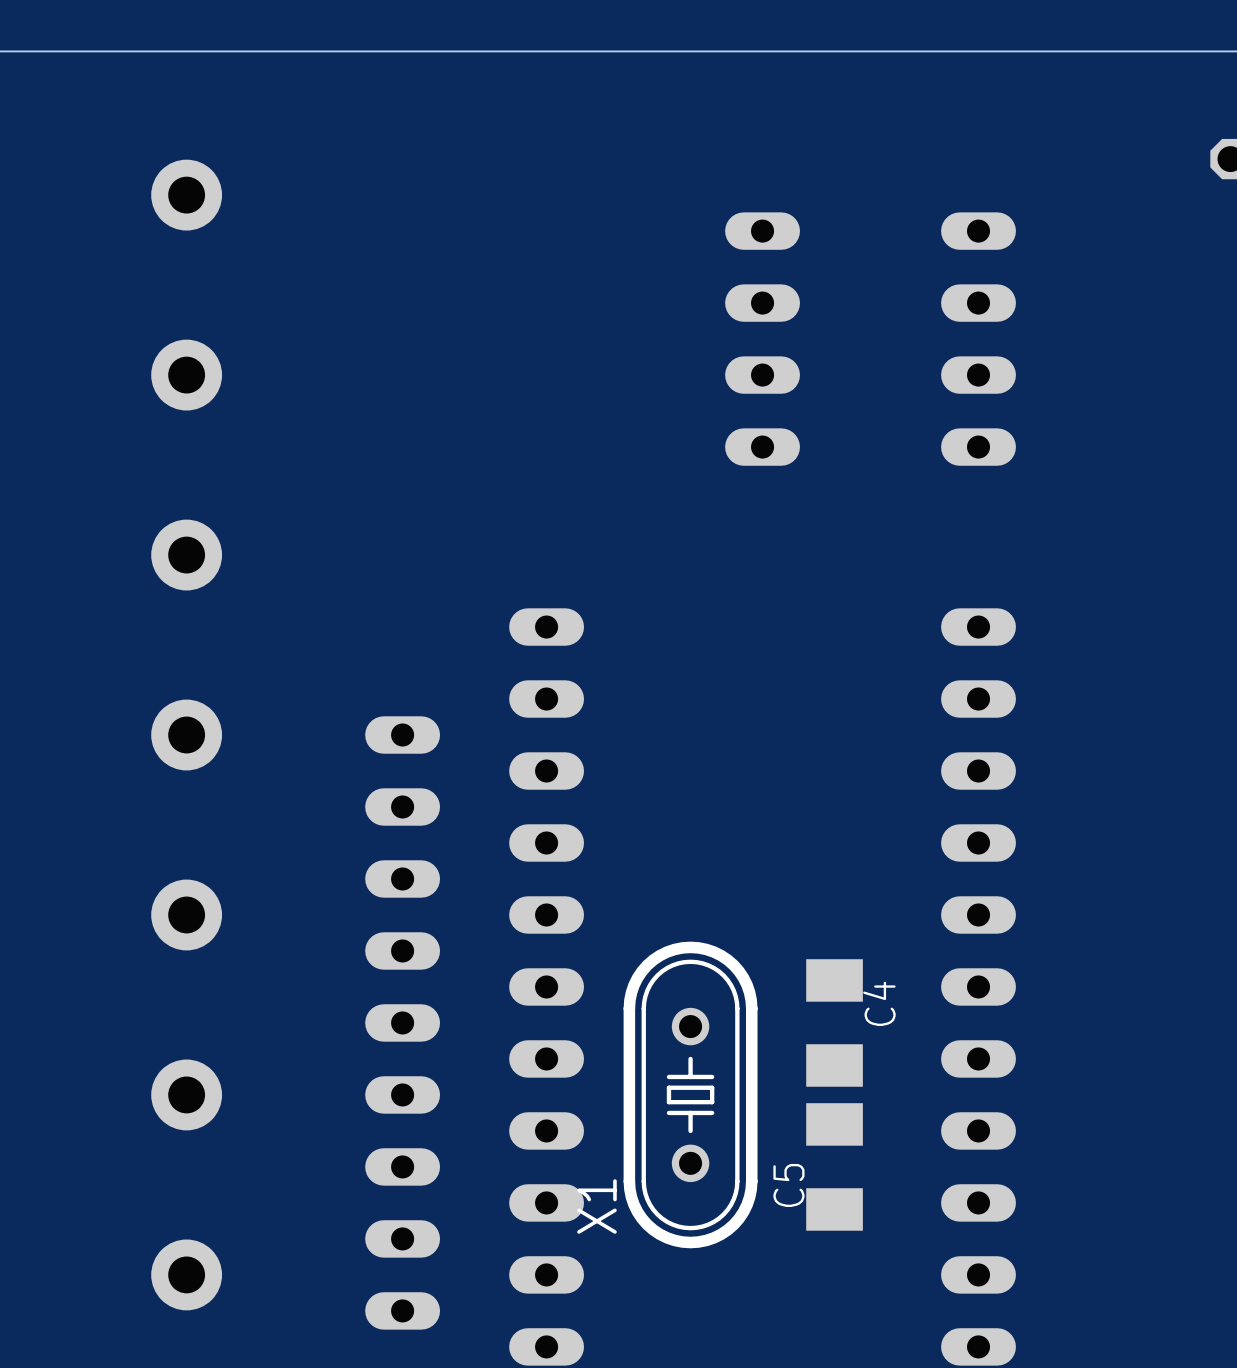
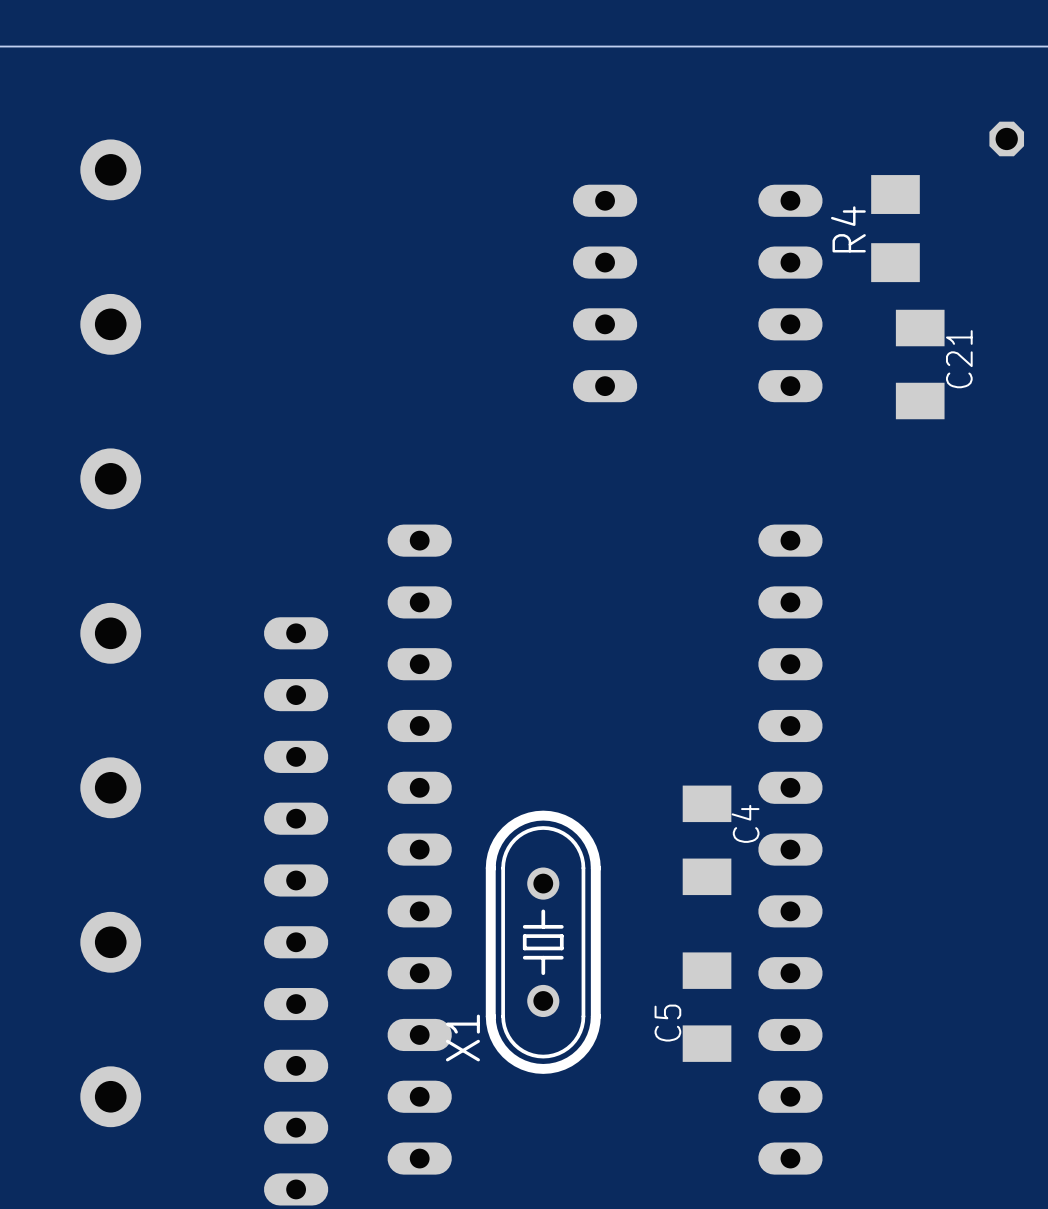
R4: none -> (895, 228)
C21: none -> (920, 364)
C4 position: (834, 1022) -> (707, 840)
C5 position: (834, 1166) -> (707, 1007)

